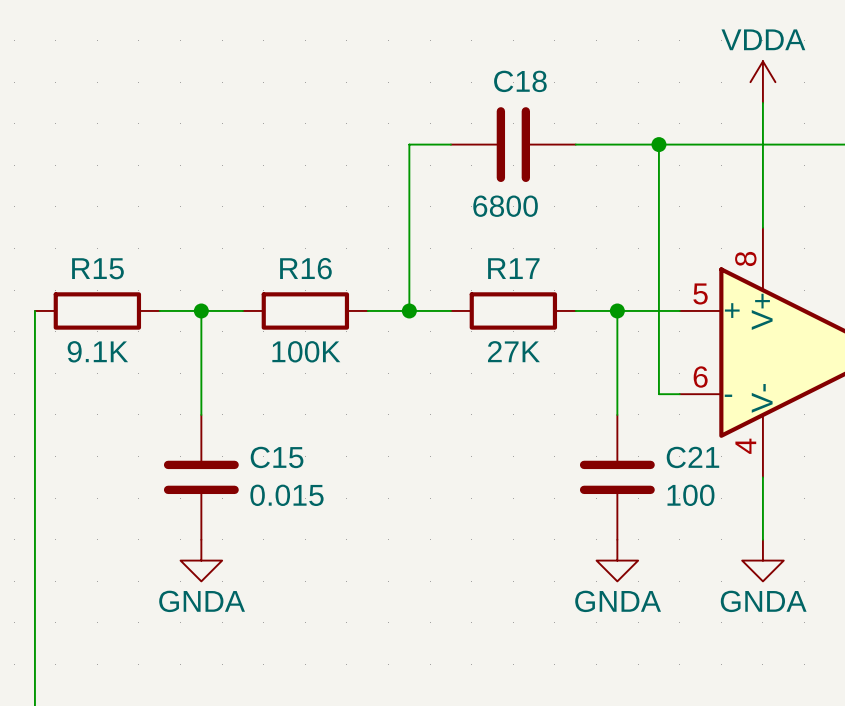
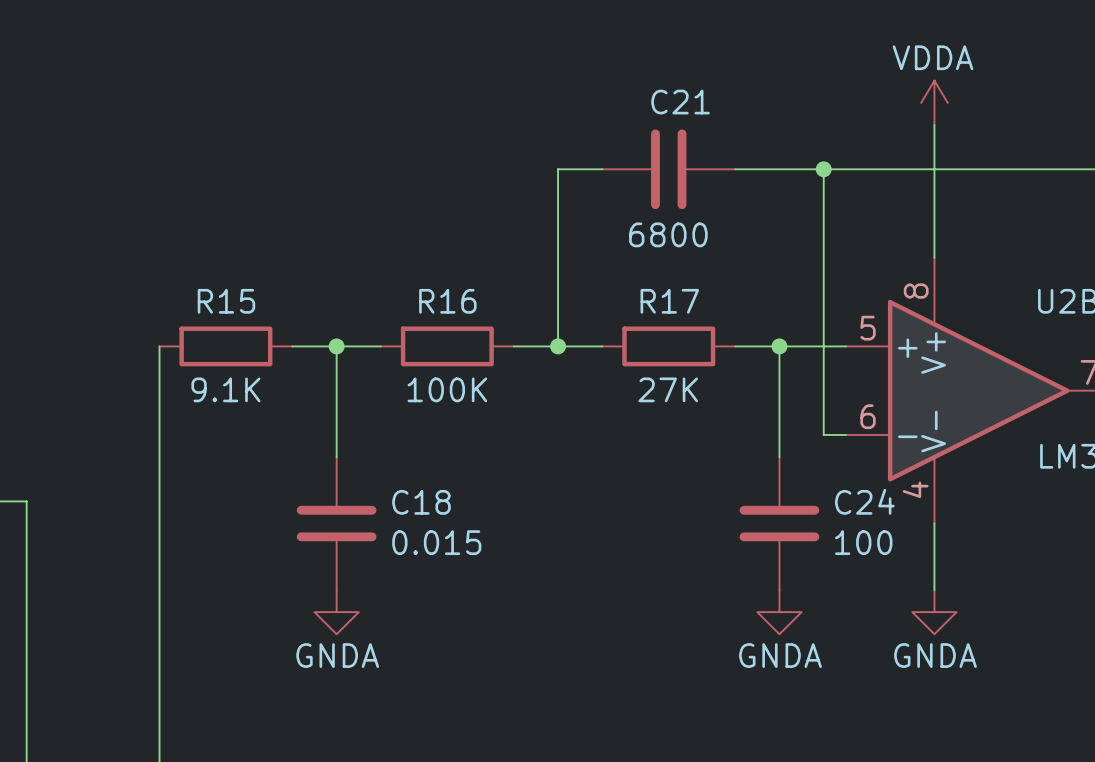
C18 name: C18 (520, 81) -> C21 (680, 102)
C15 name: C15 (277, 457) -> C18 (421, 502)
C21 name: C21 (692, 457) -> C24 (864, 501)

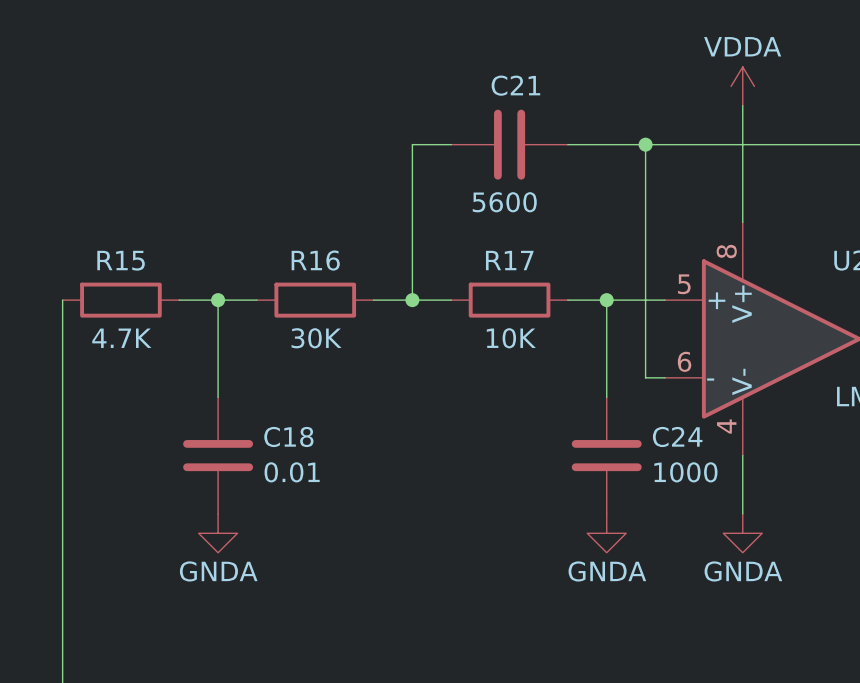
C21 value: 6800 (668, 234) -> 5600 (504, 202)
R15 value: 9.1K (225, 389) -> 4.7K (121, 338)
R16 value: 100K (447, 389) -> 30K (316, 338)
R17 value: 27K (668, 389) -> 10K (511, 338)
C18 value: 0.015 (436, 542) -> 0.01 (292, 472)
C24 value: 100 (863, 542) -> 1000 (685, 472)

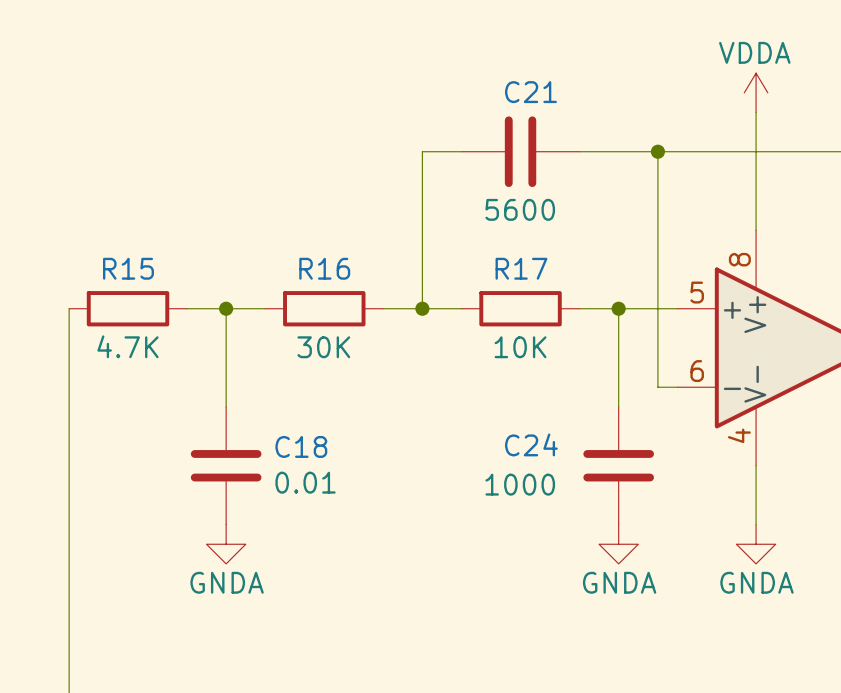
C24 name position: C24 (677, 436) -> C24 (531, 444)
C24 value position: 1000 (685, 472) -> 1000 (520, 484)

